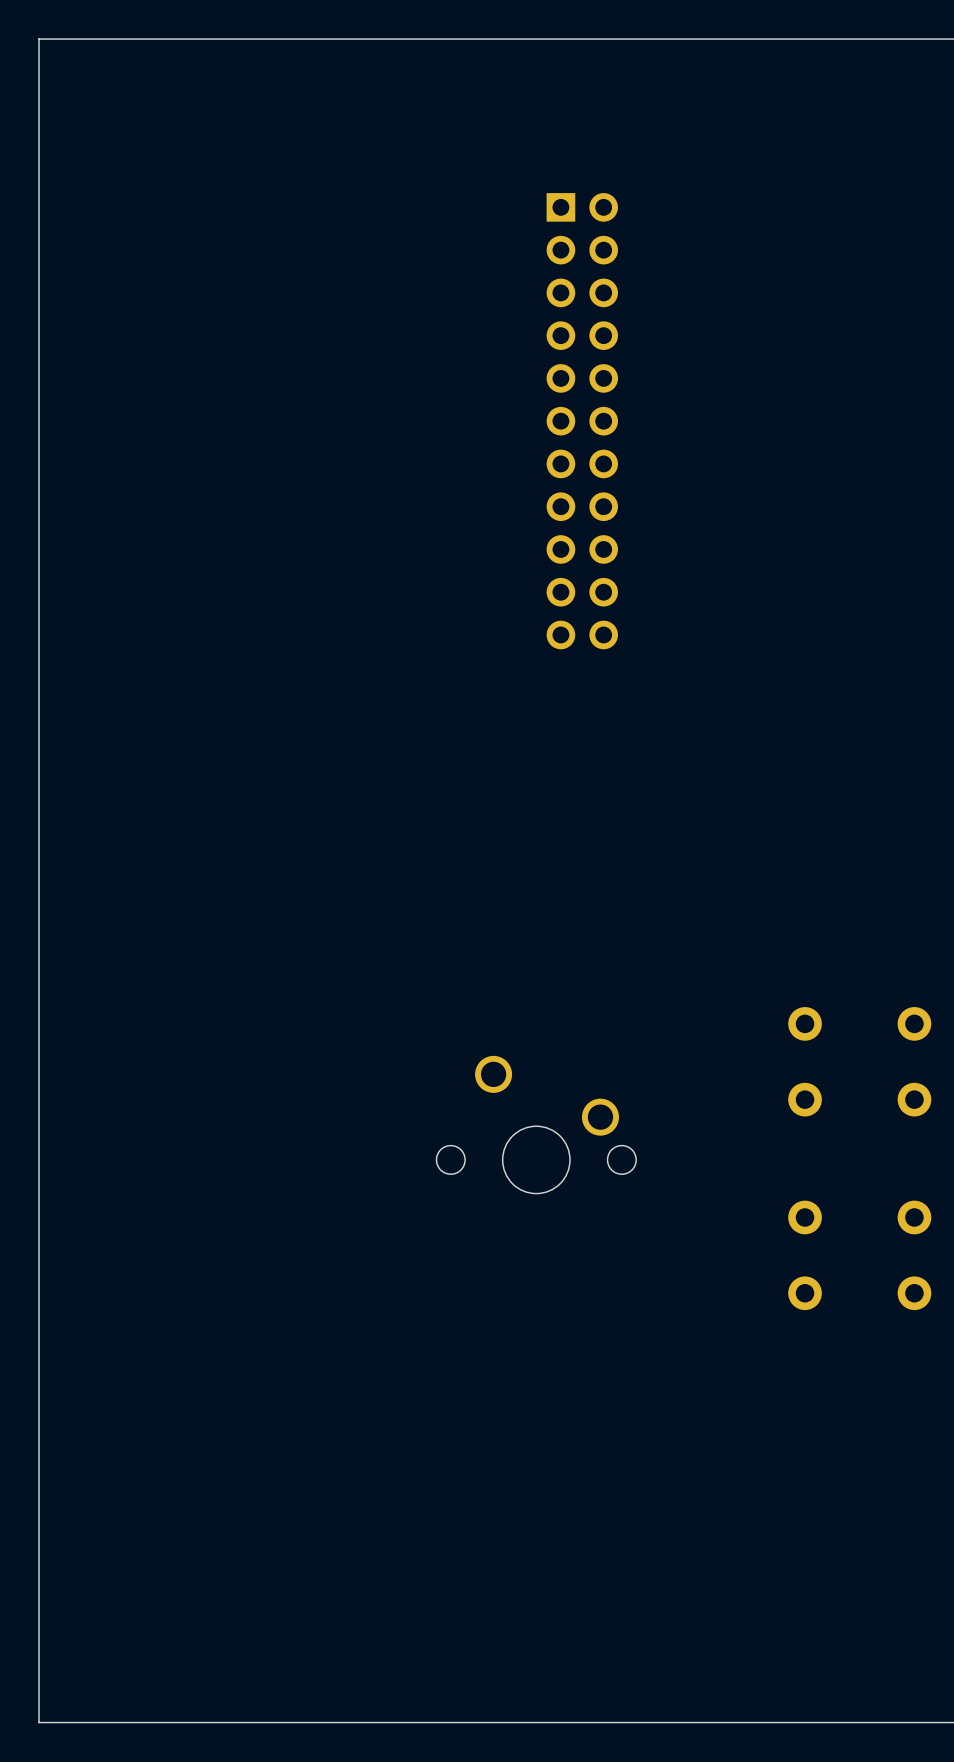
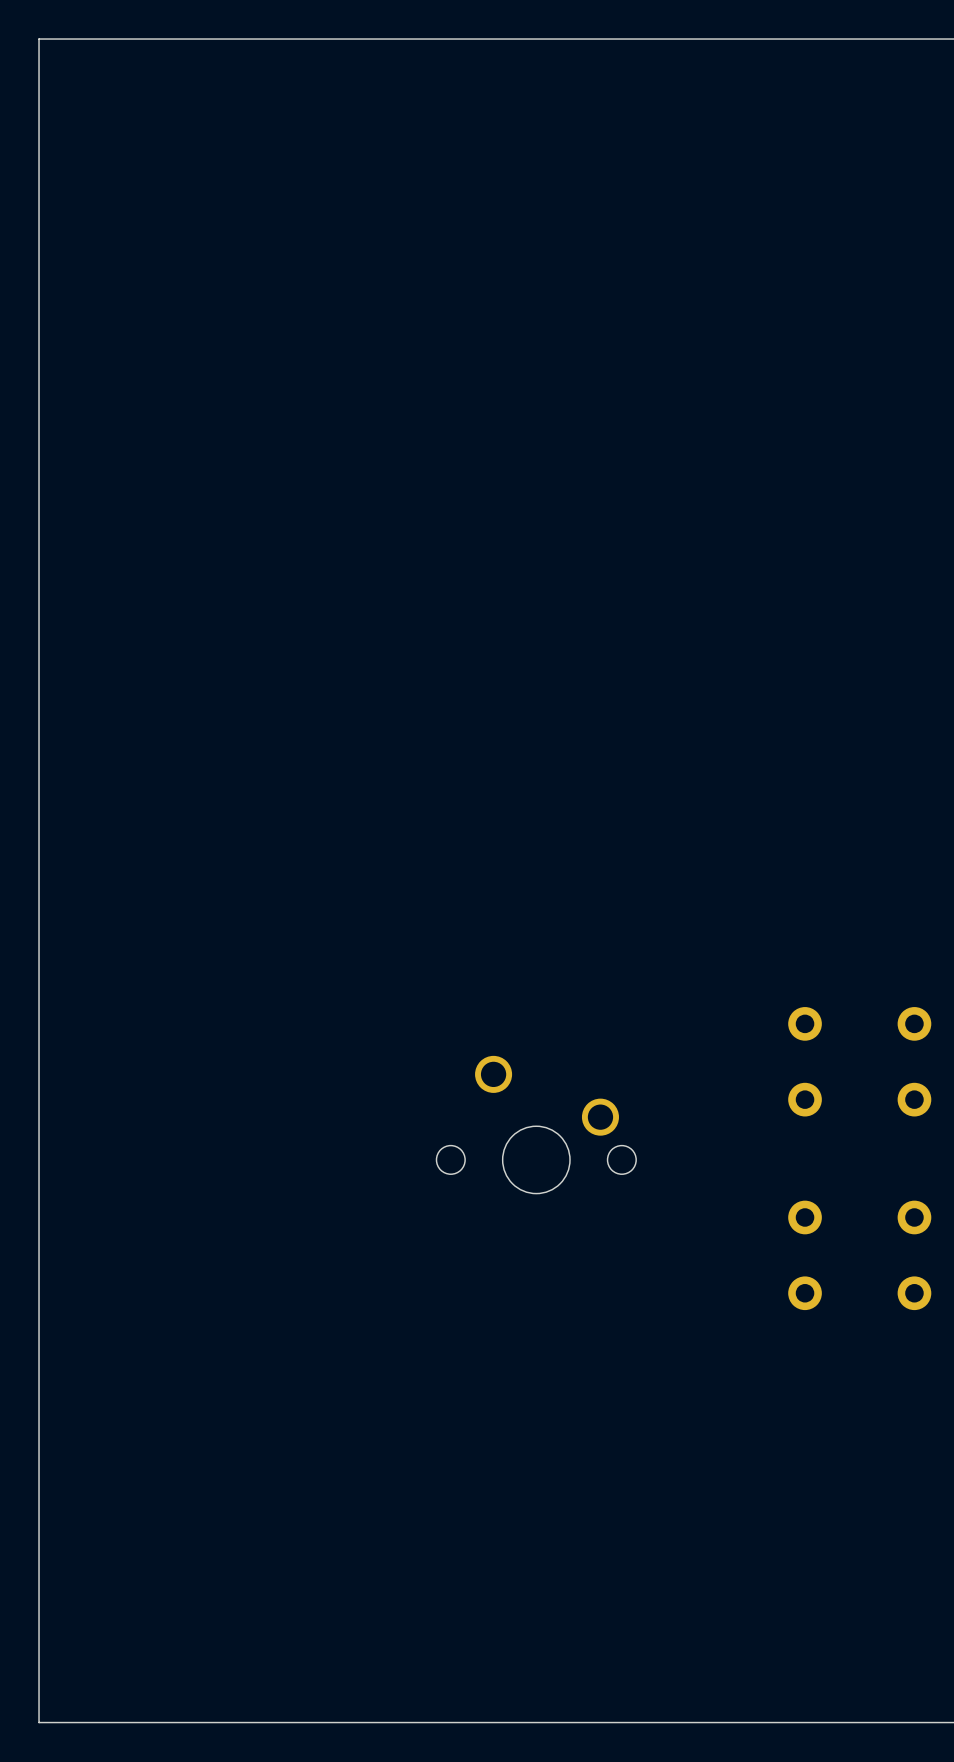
part: (582, 421) -> none

